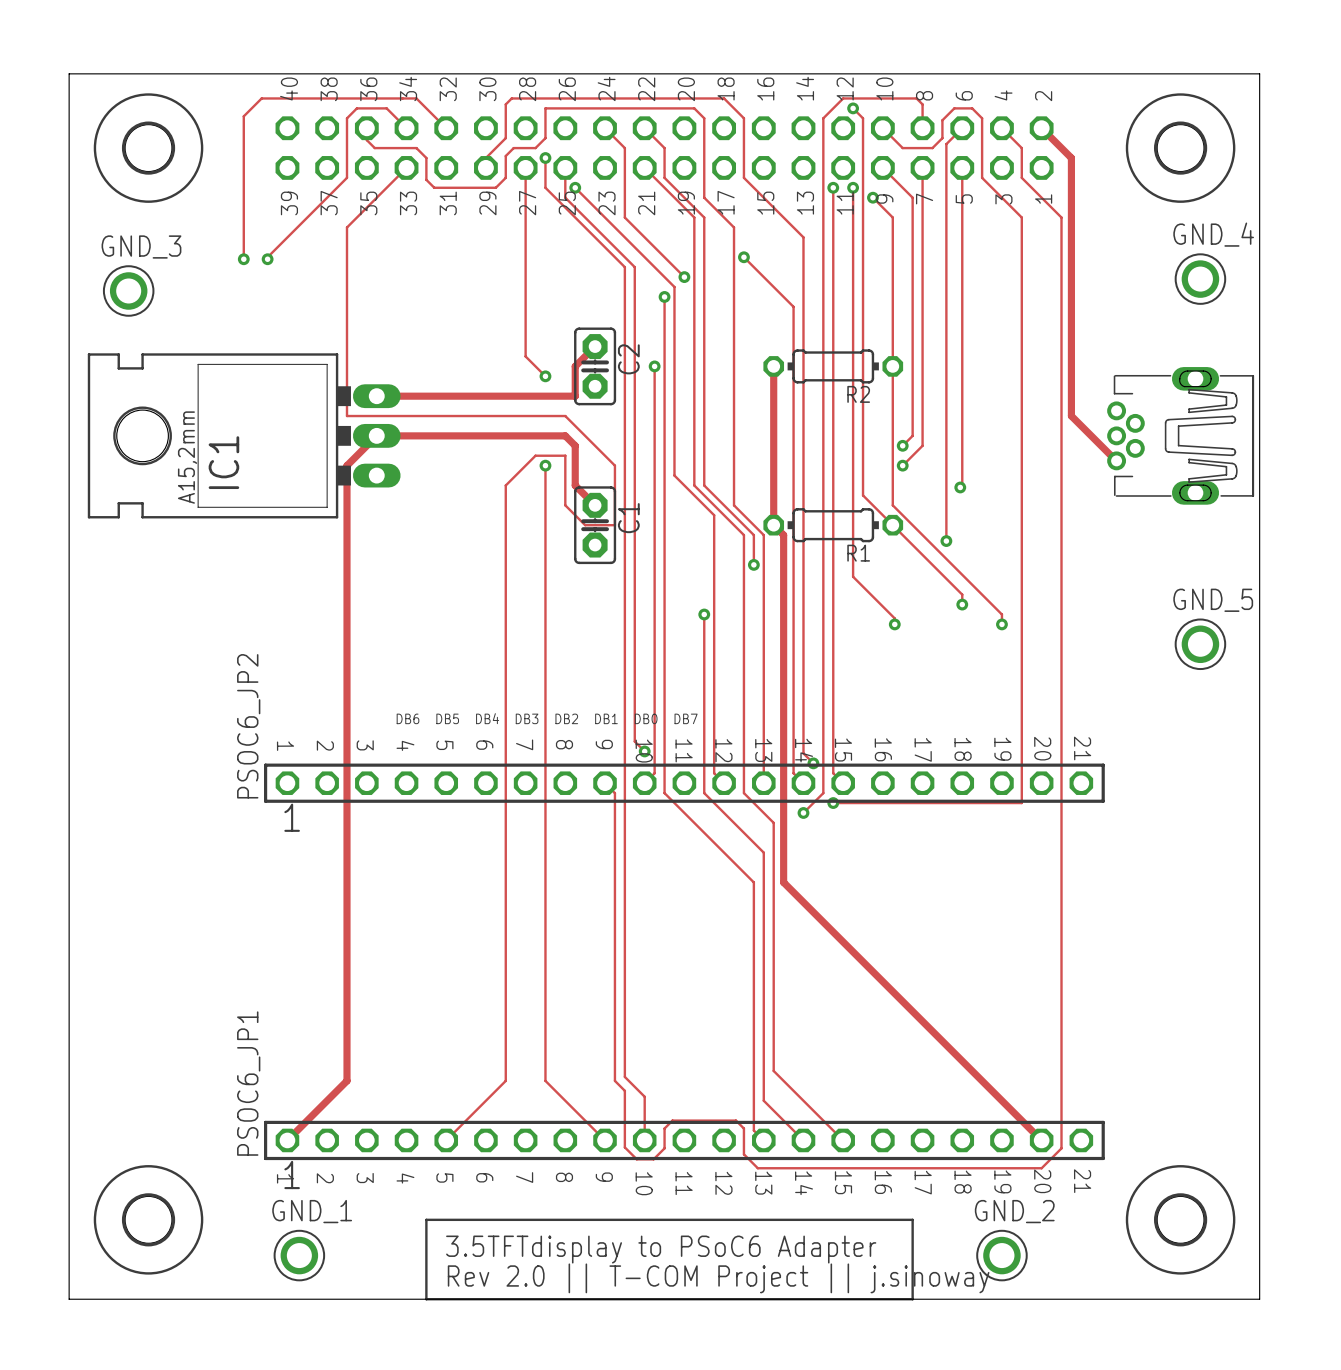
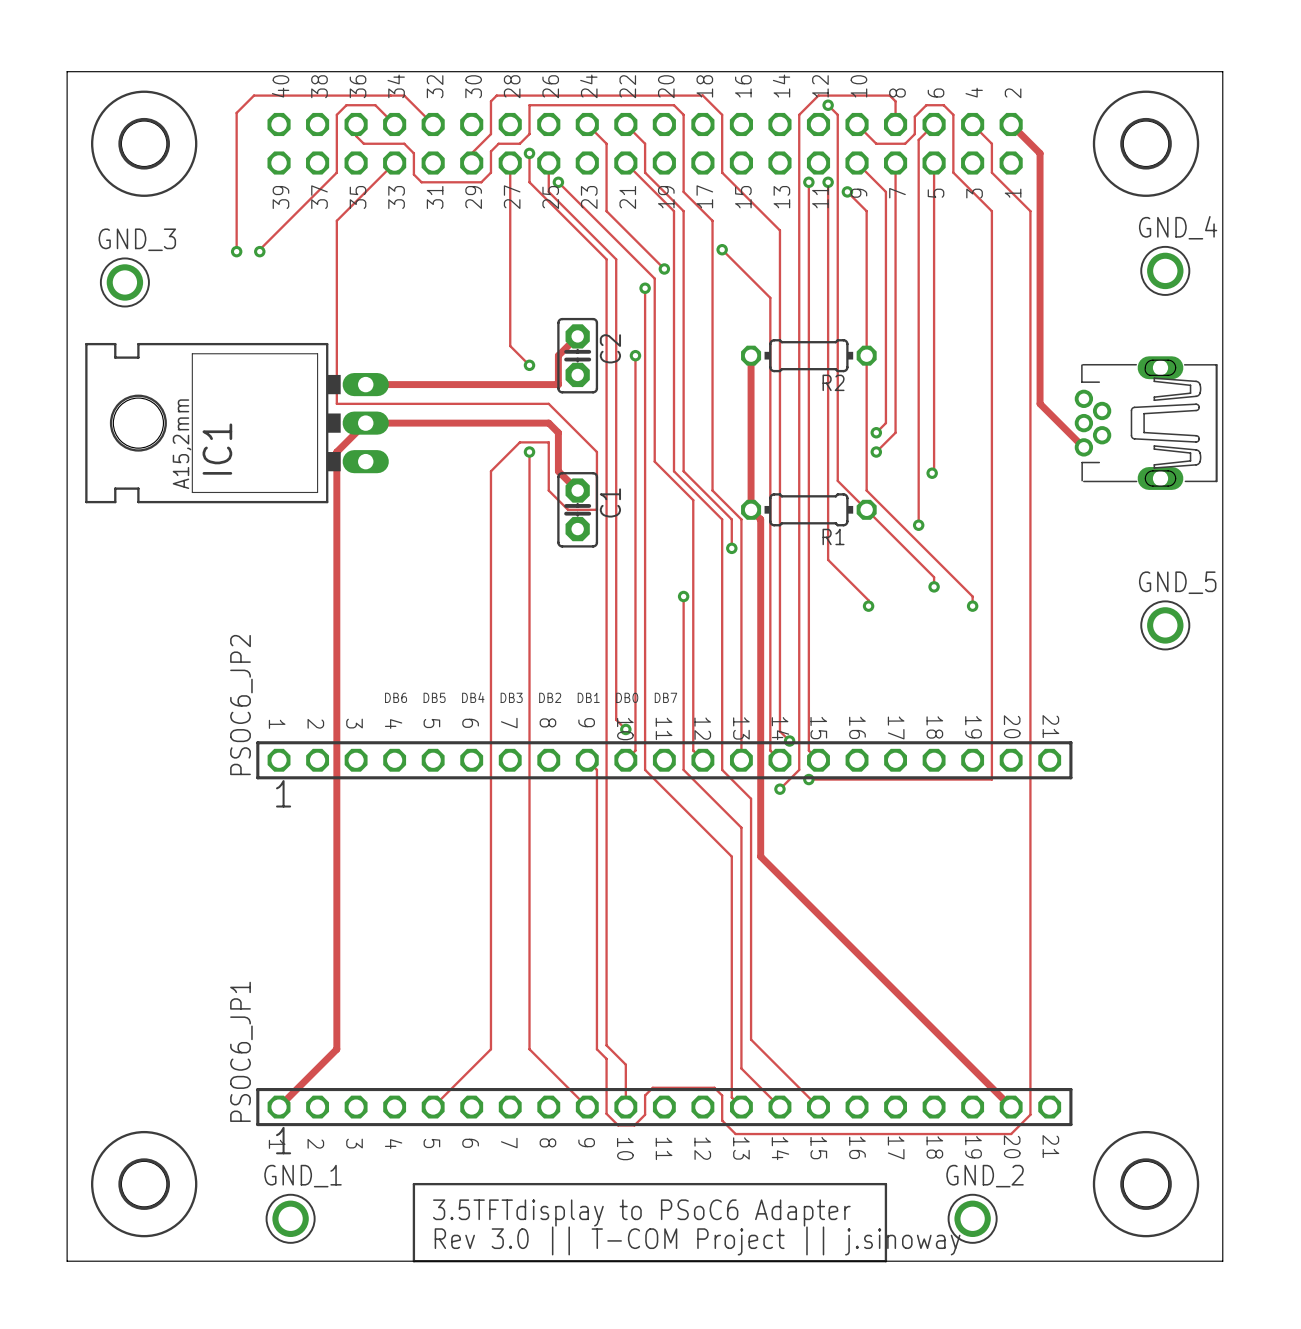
text: Rev 2.0 || T-COM Project || j.sinoway (718, 1278) -> Rev 3.0 || T-COM Project || j.sinoway (697, 1240)

